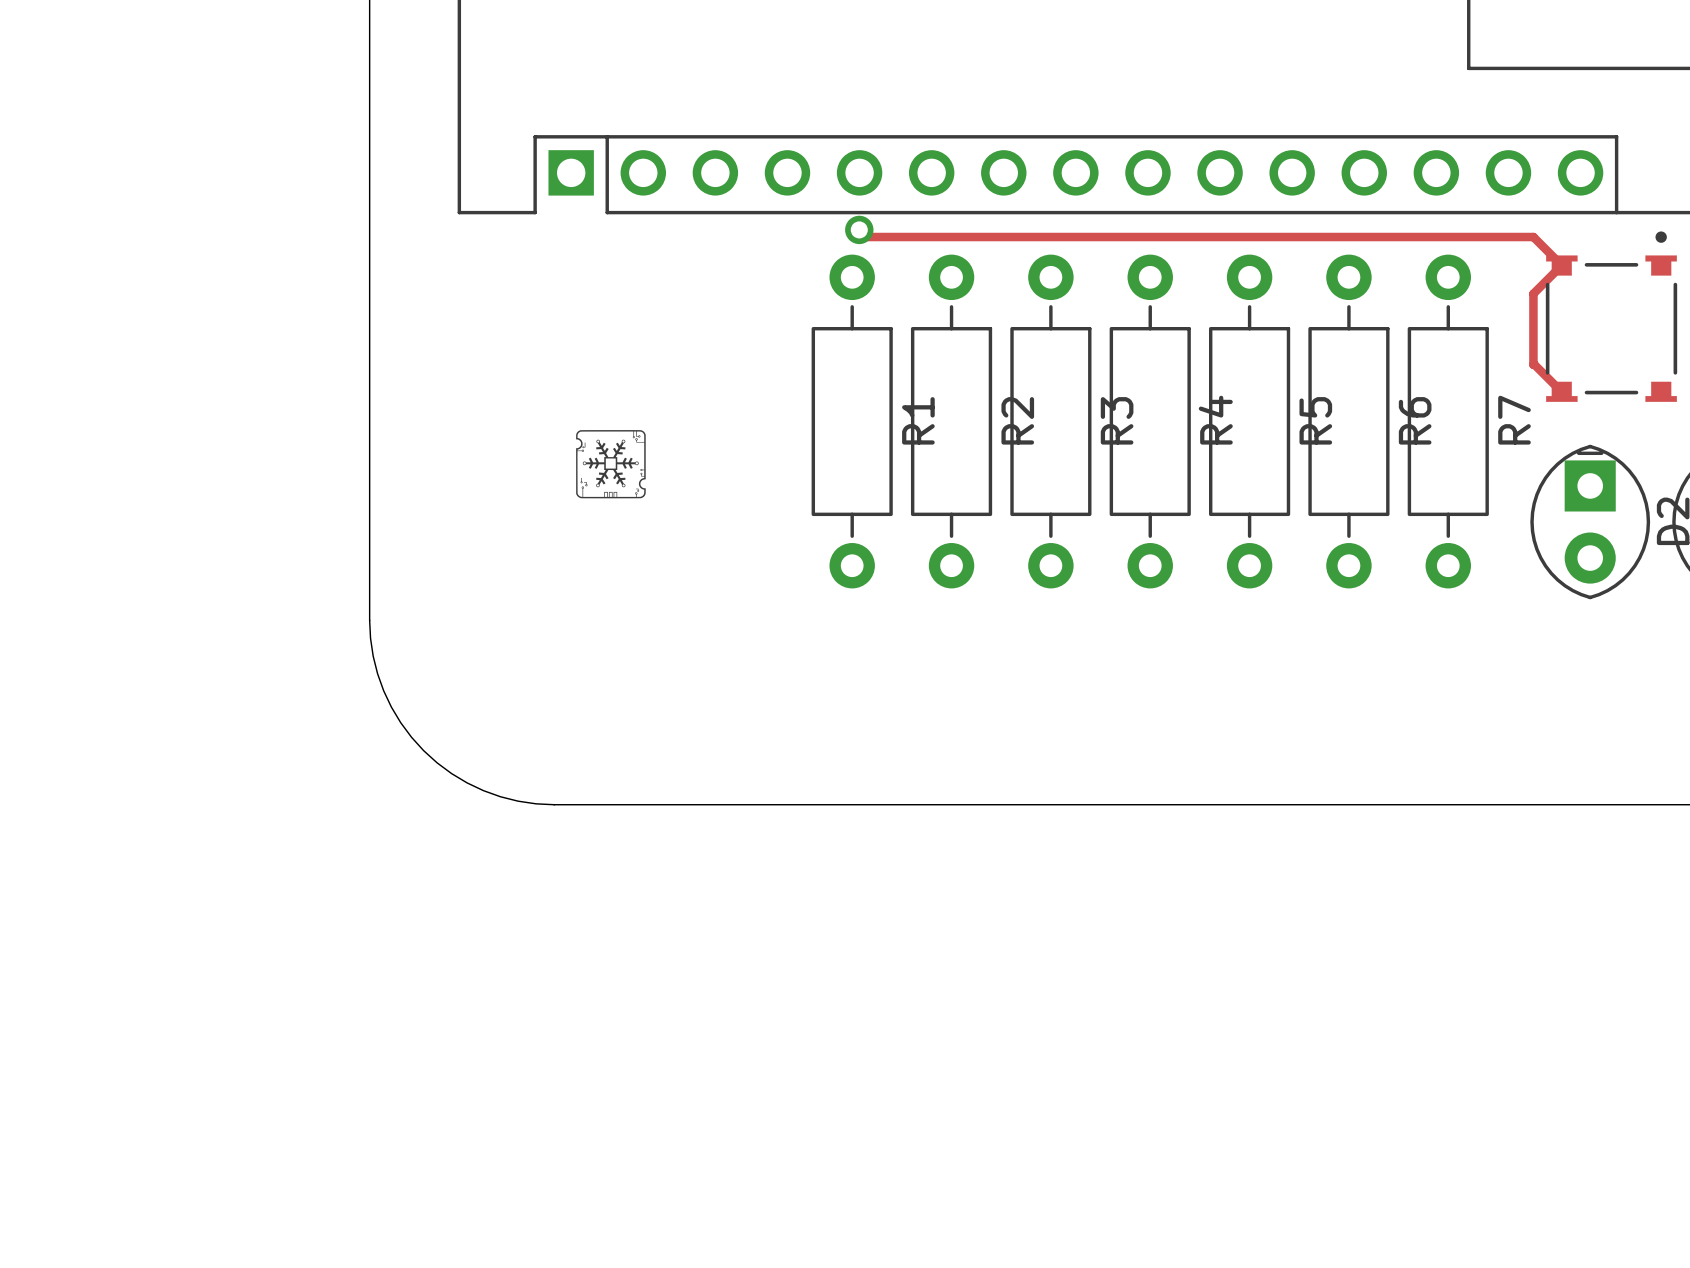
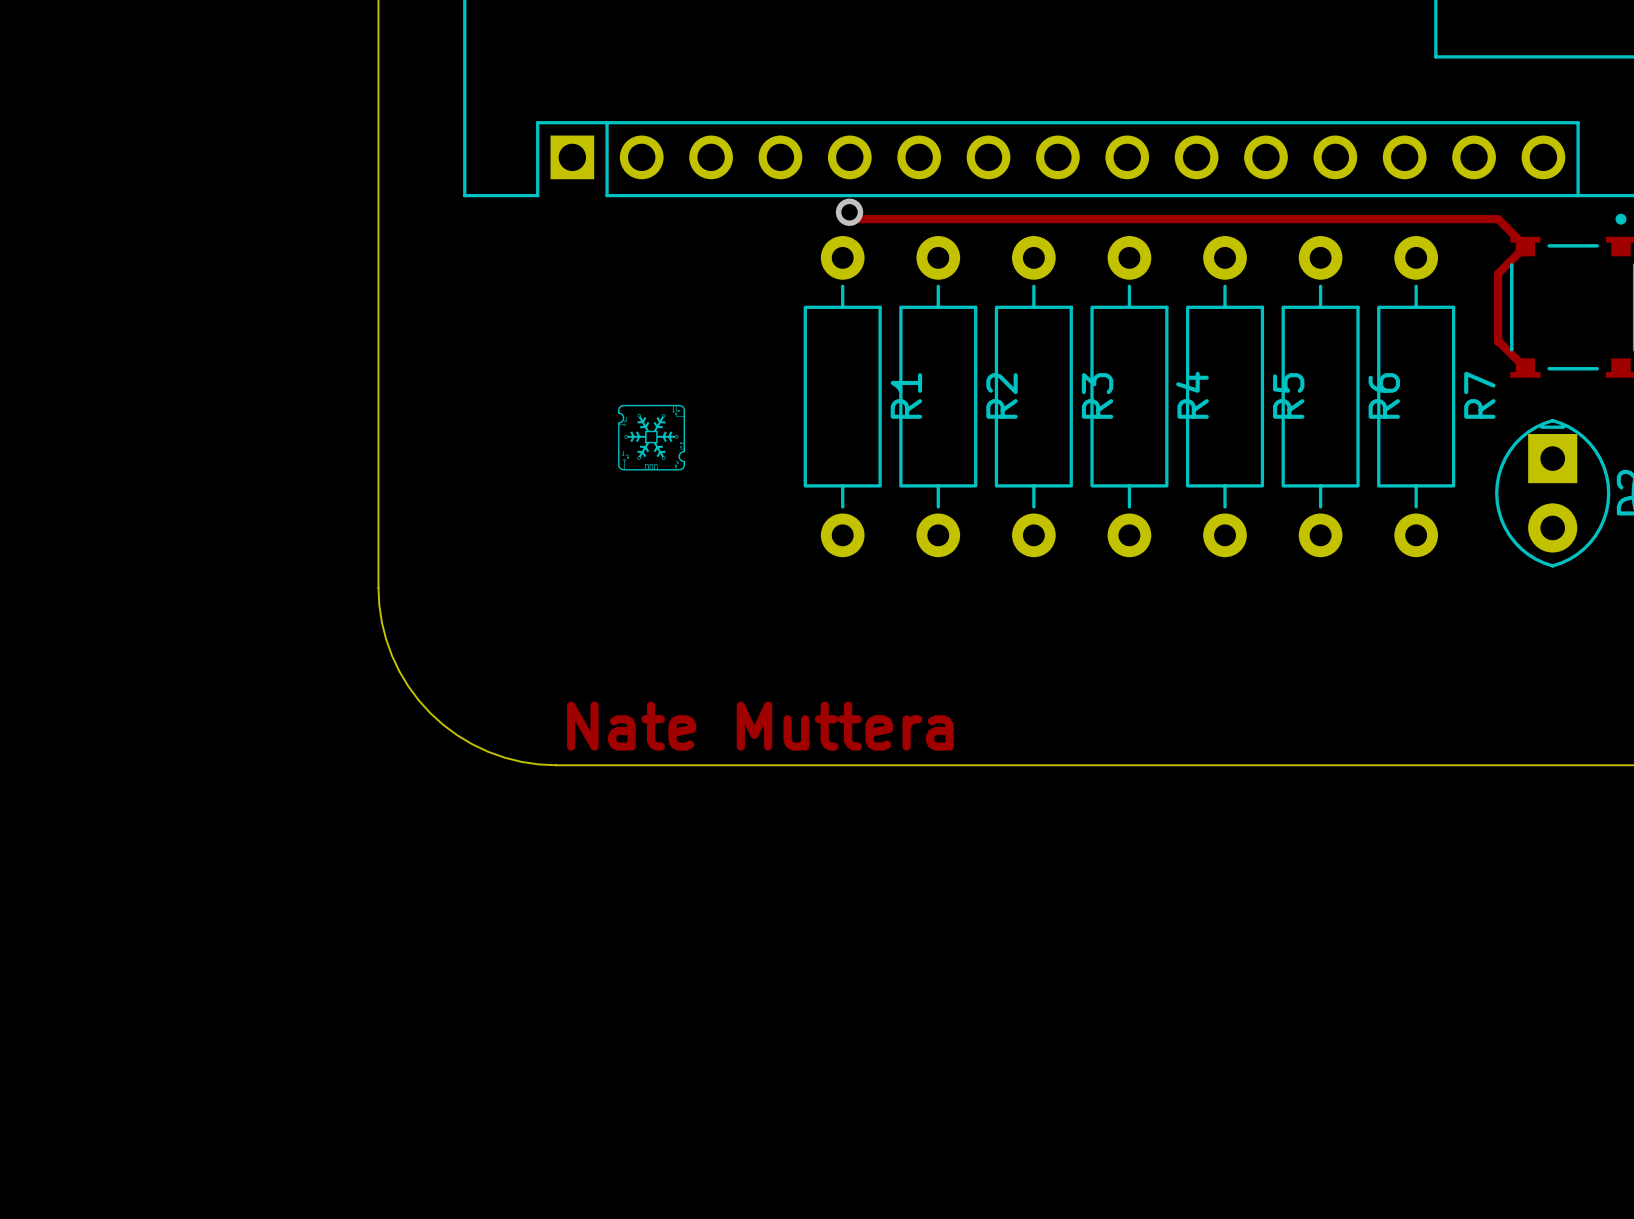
drawing position: (610, 464) -> (651, 437)
text: none -> Nate Muttera (760, 726)

